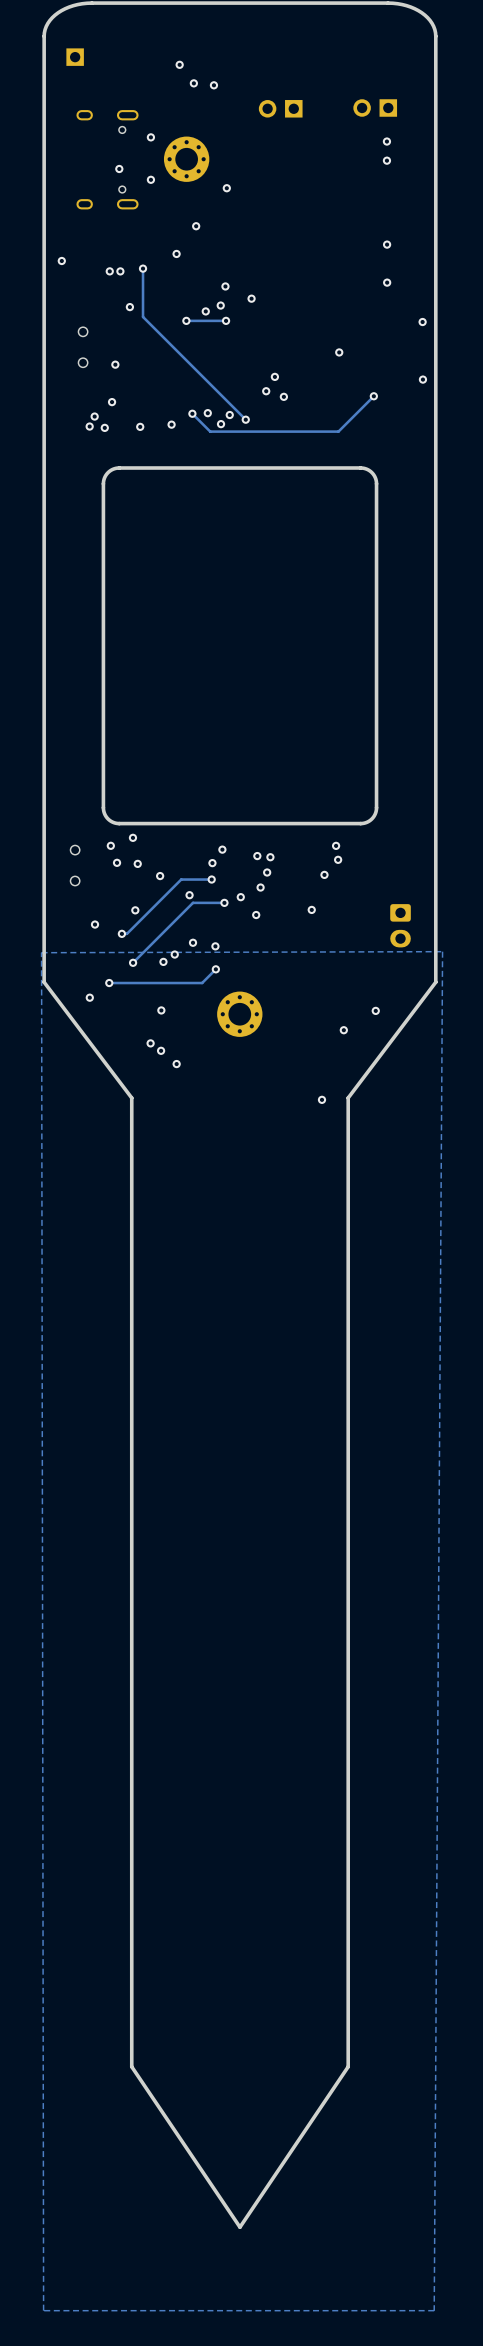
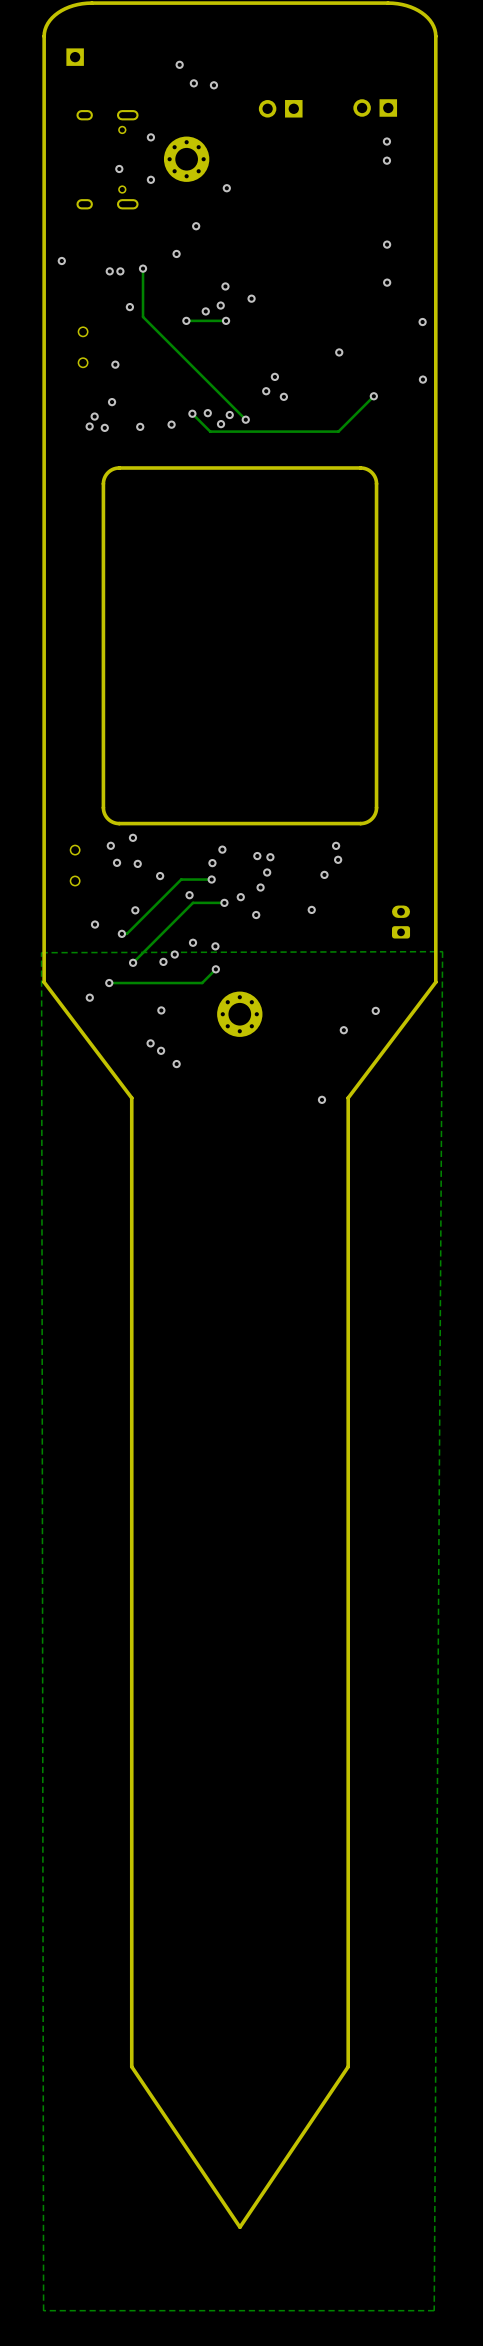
part footprint: [390, 904, 411, 948] -> [392, 905, 411, 939]

